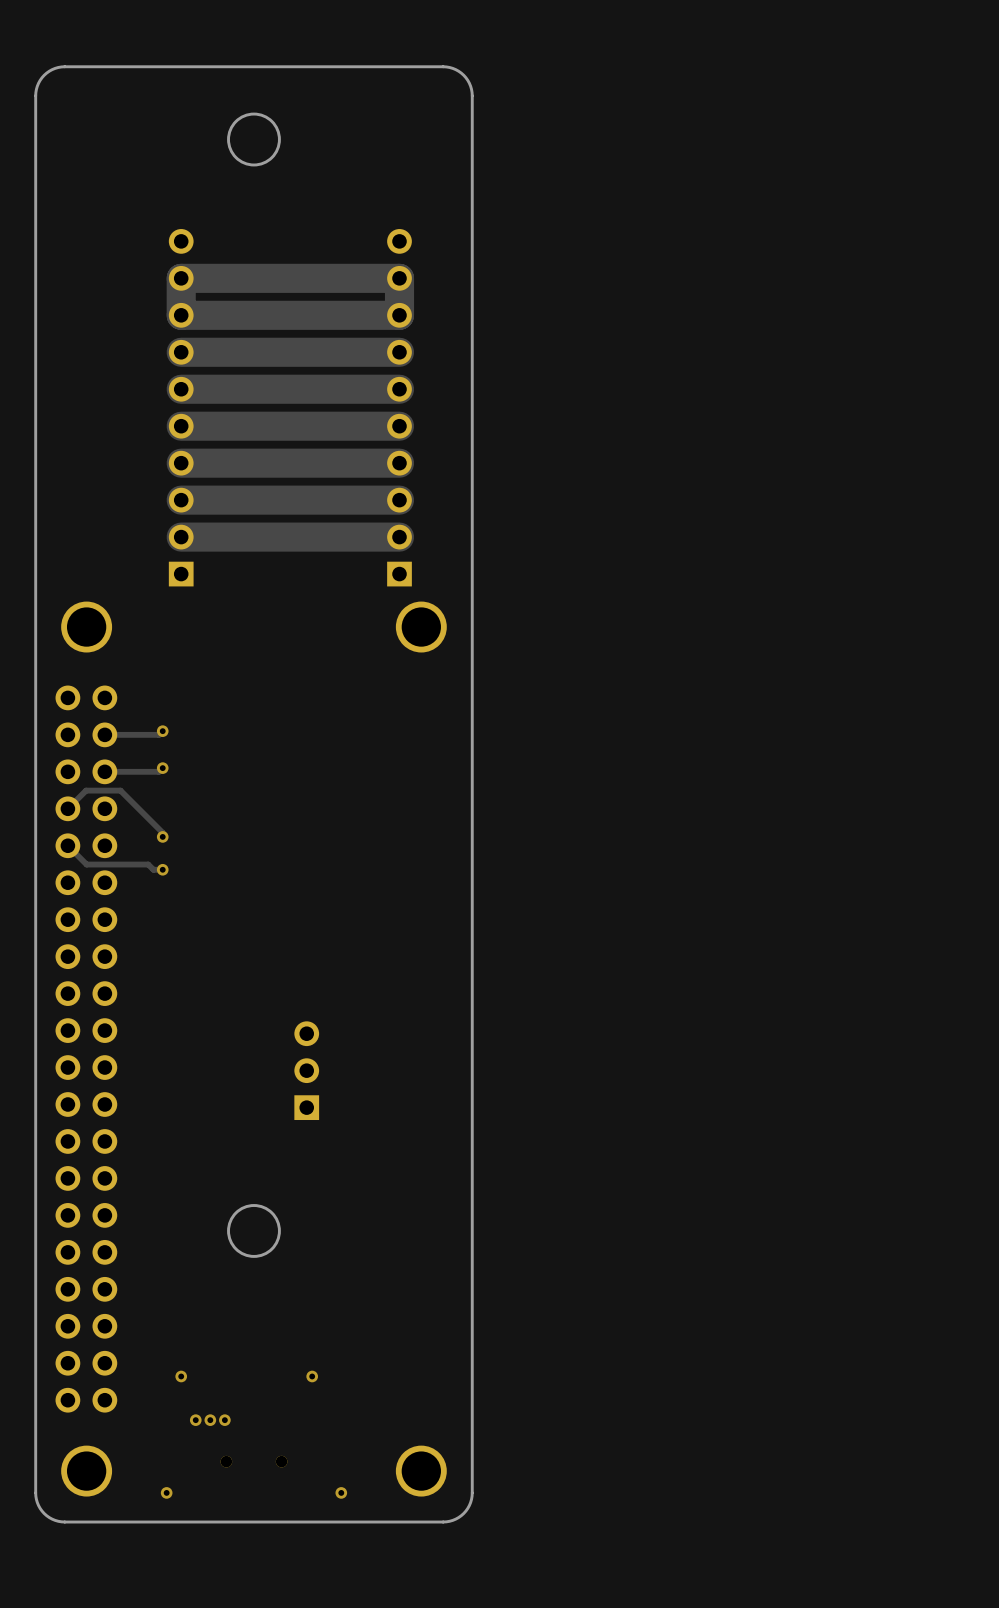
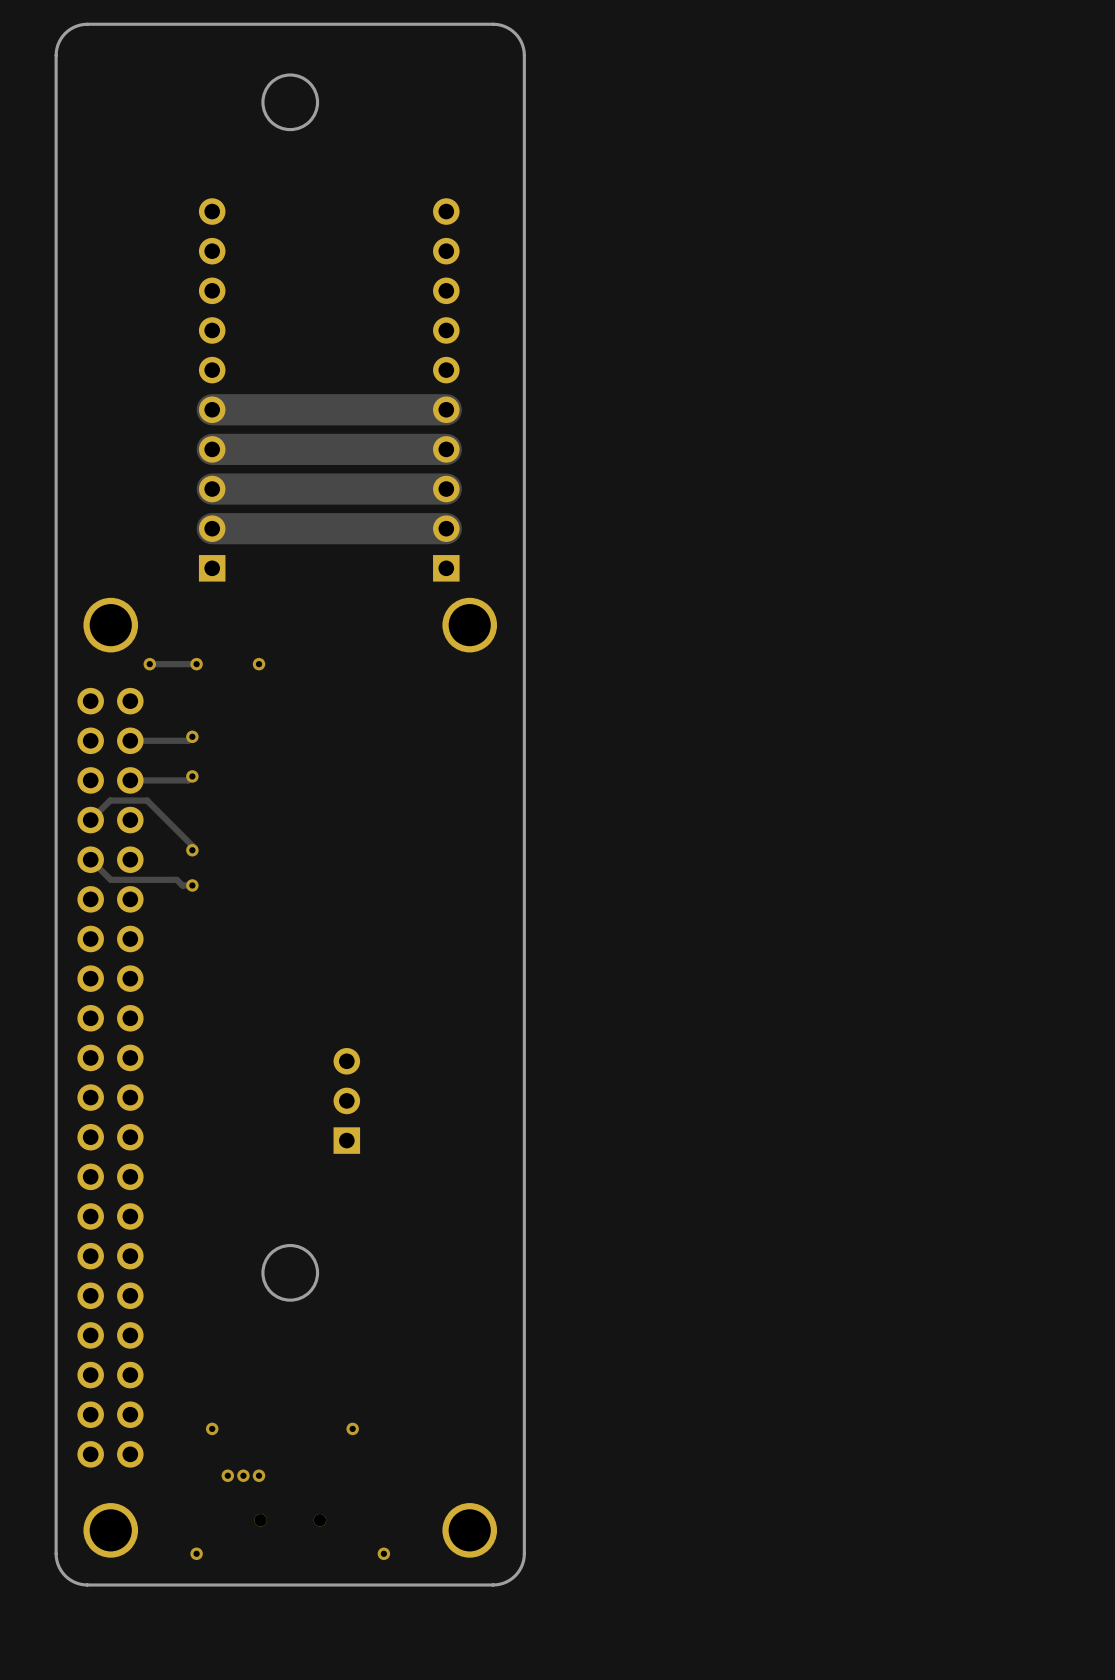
track: (399, 278) (181, 278) (181, 315) (399, 315) (399, 278) -> none
track: (399, 352) (181, 352) -> none
track: (399, 389) (181, 389) -> none
via: none -> (149, 664)
track: none -> (196, 664) (149, 664)
via: none -> (196, 664)
via: none -> (259, 664)

